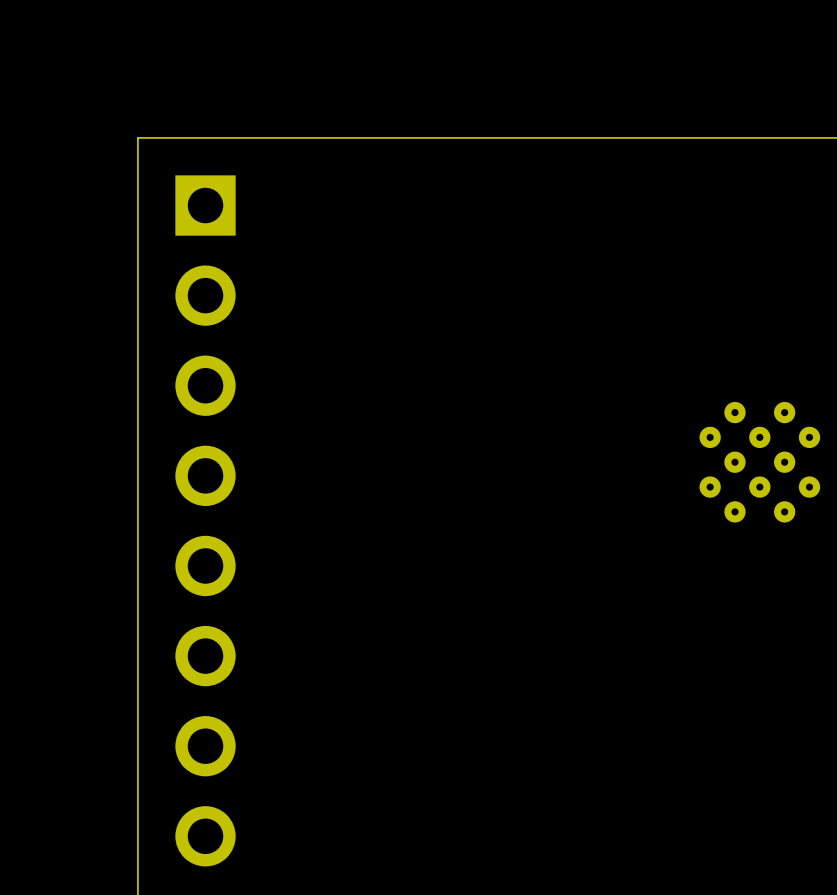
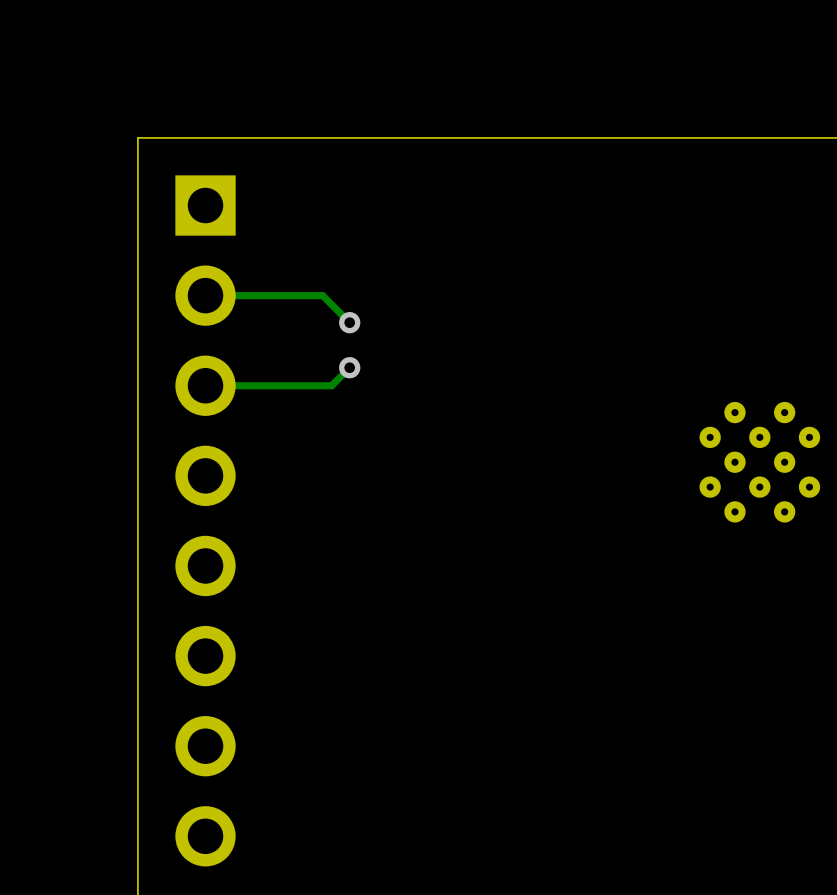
track: none -> (205, 295) (322, 295) (349, 322)
via: none -> (349, 322)
track: none -> (349, 367) (331, 385) (205, 385)
via: none -> (349, 367)

